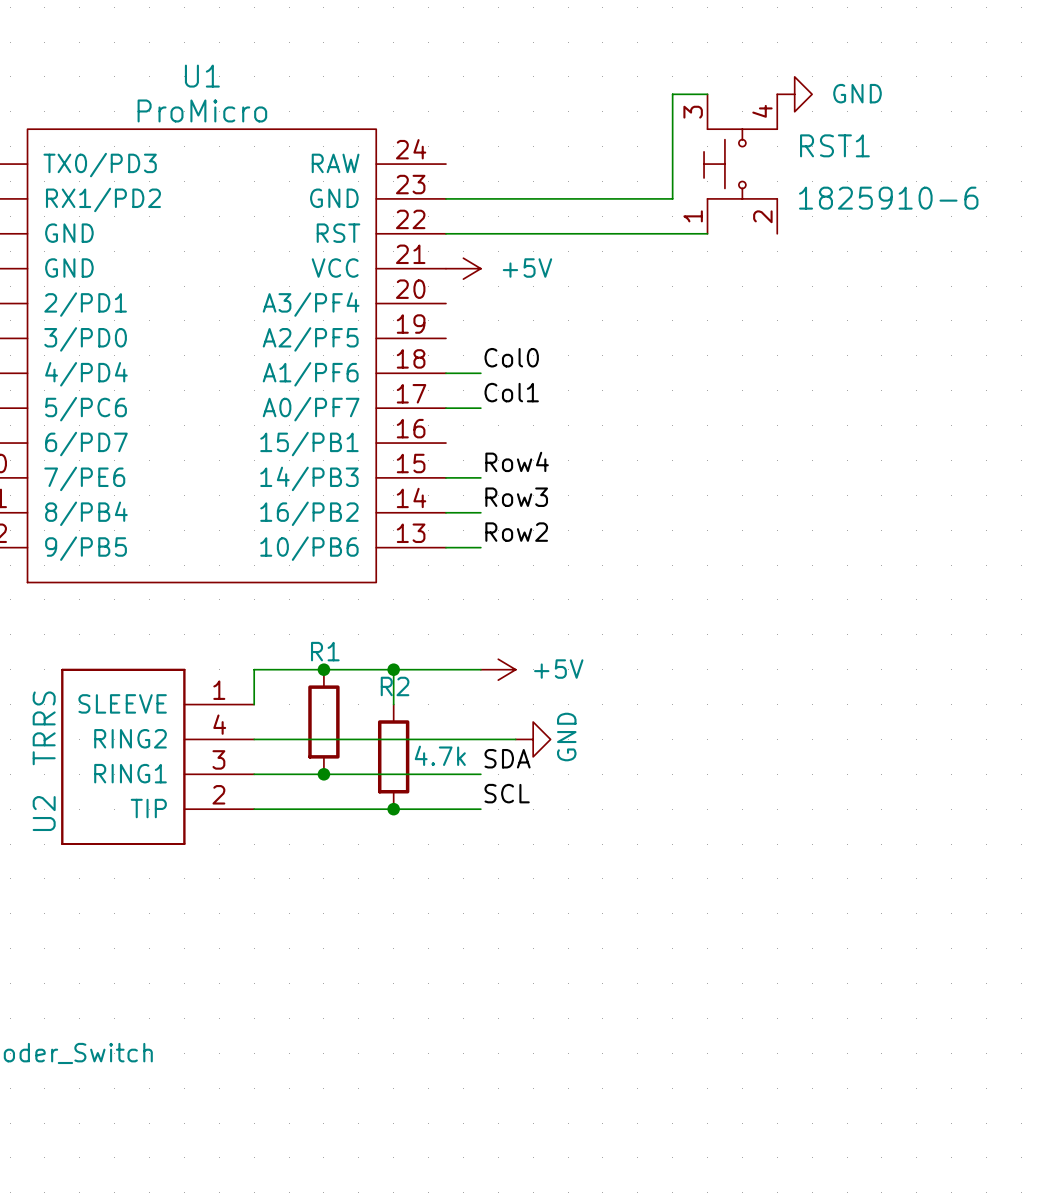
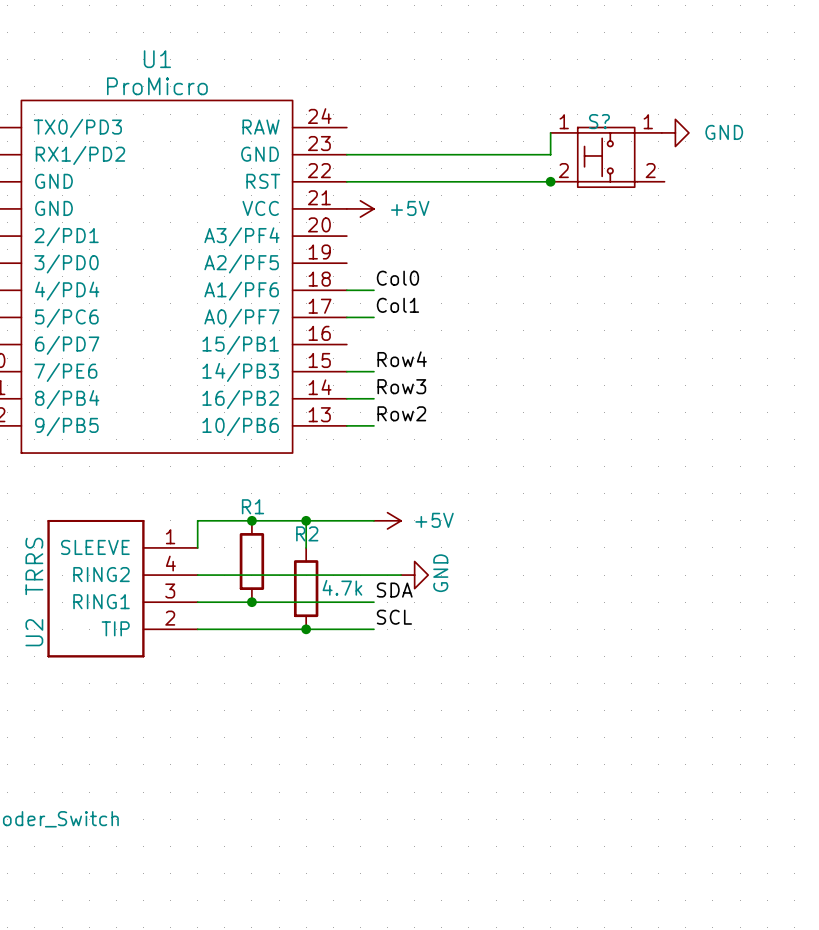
wire: (707, 94) (672, 94) (672, 198) -> (550, 132) (550, 154) (523, 154)
power symbol position: GND (794, 94) -> GND (675, 132)
RST1: 1825910-6 (740, 164) -> none
S?: none -> (607, 157)
junction: none -> (550, 181)

